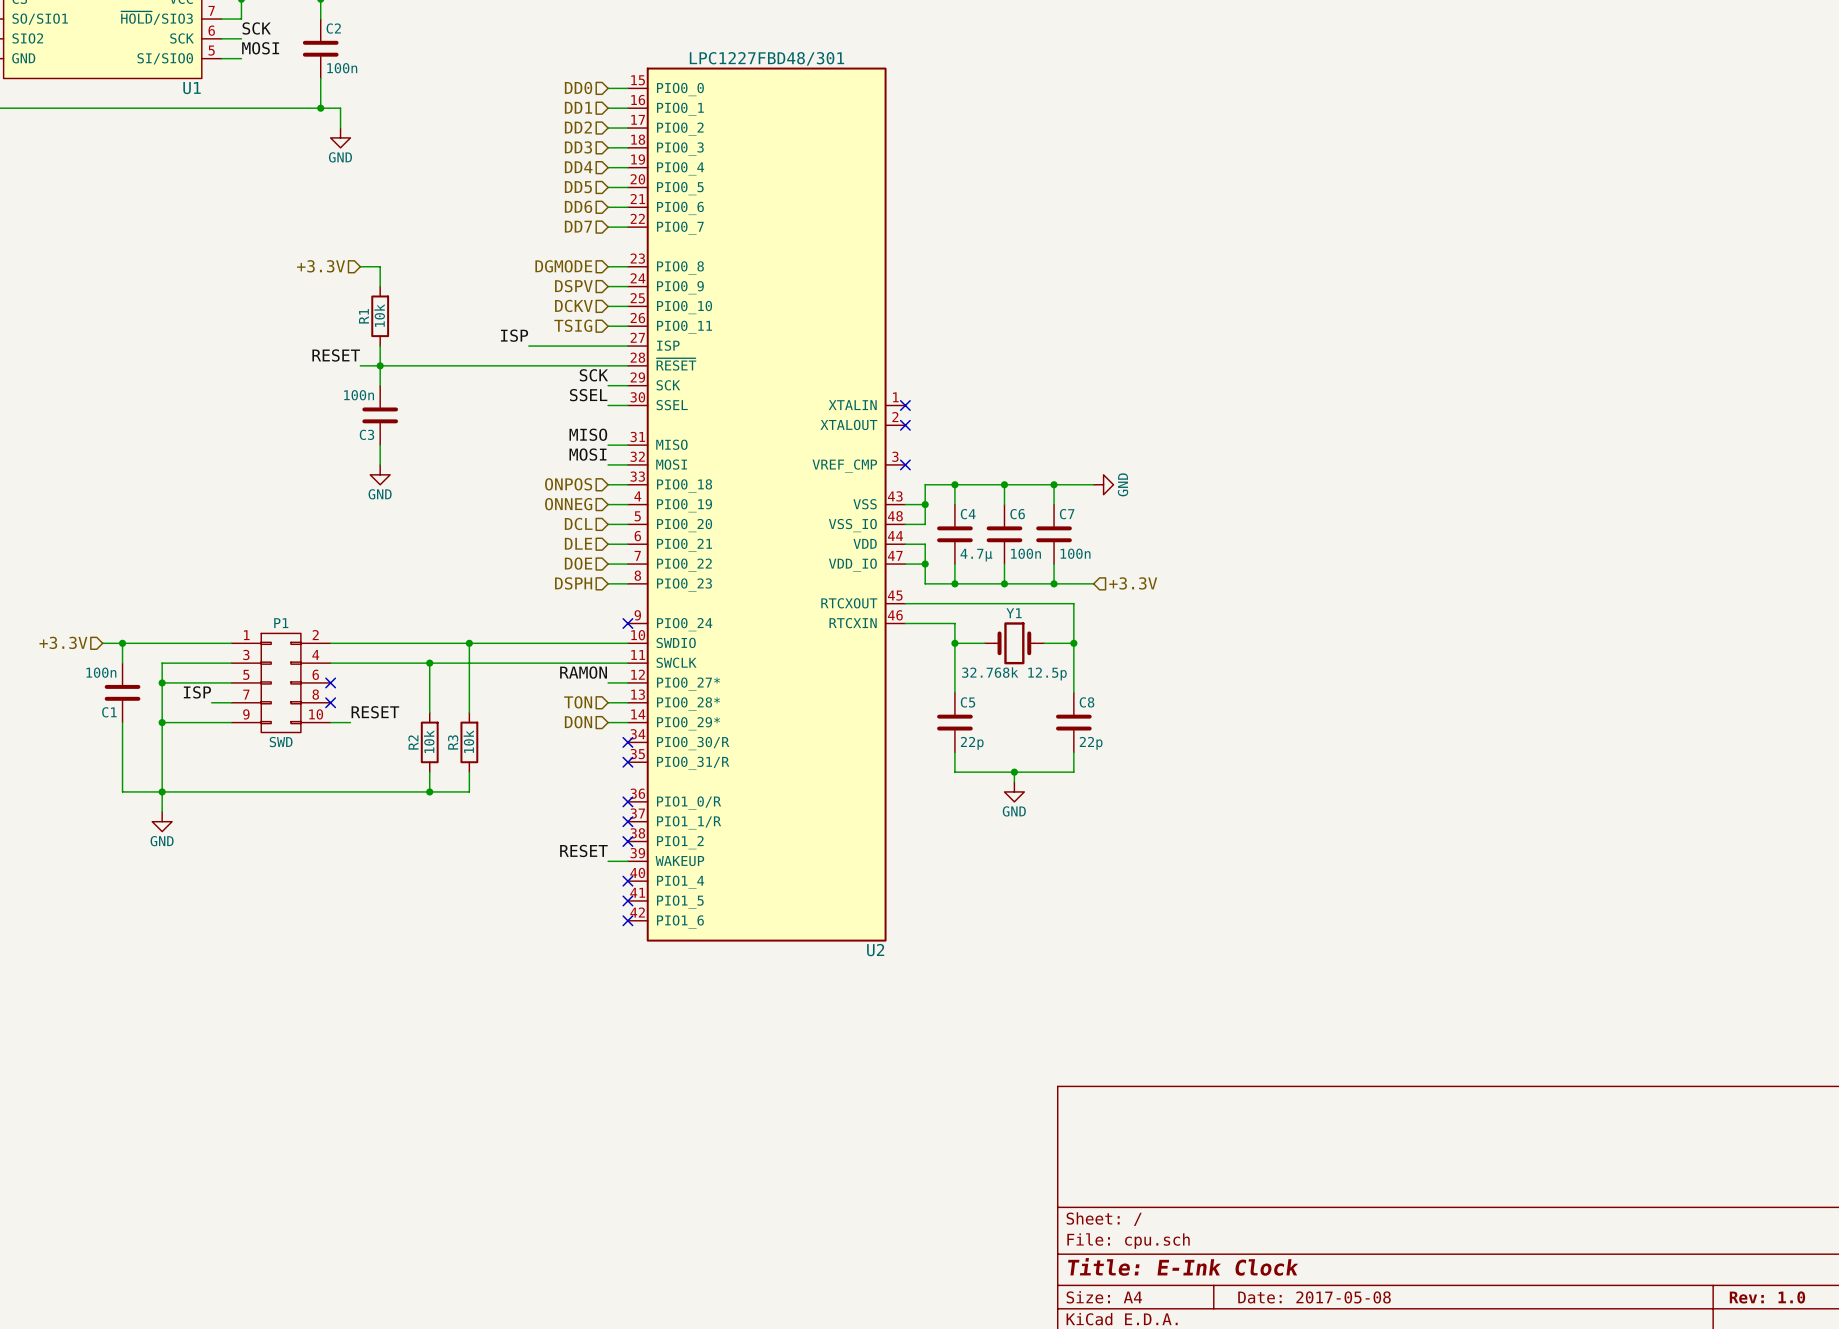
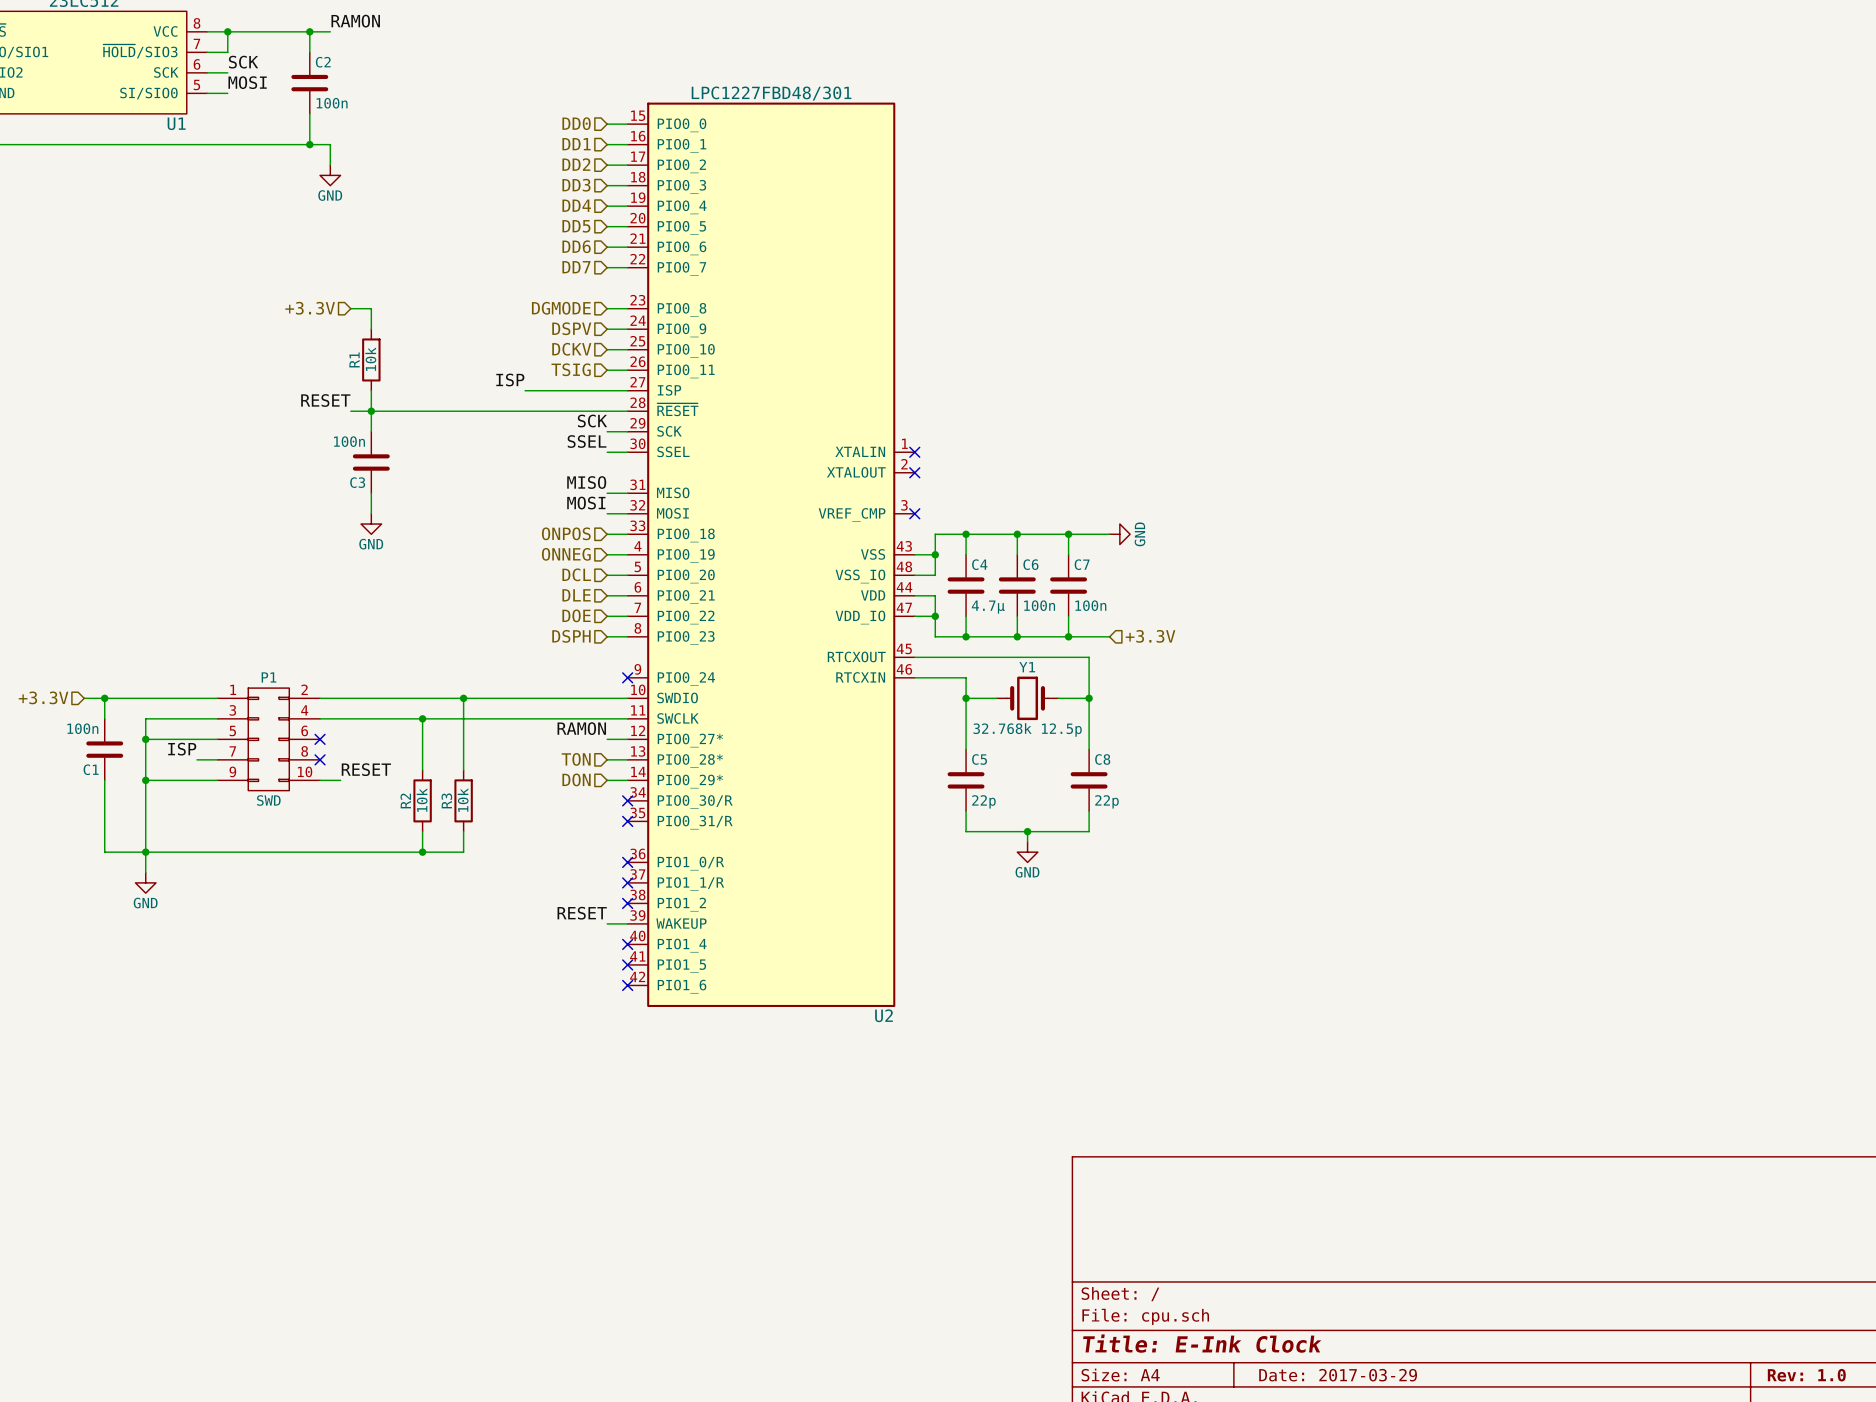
title block: Date: 2017-05-08 (1314, 1297) -> Date: 2017-03-29 (1338, 1375)

